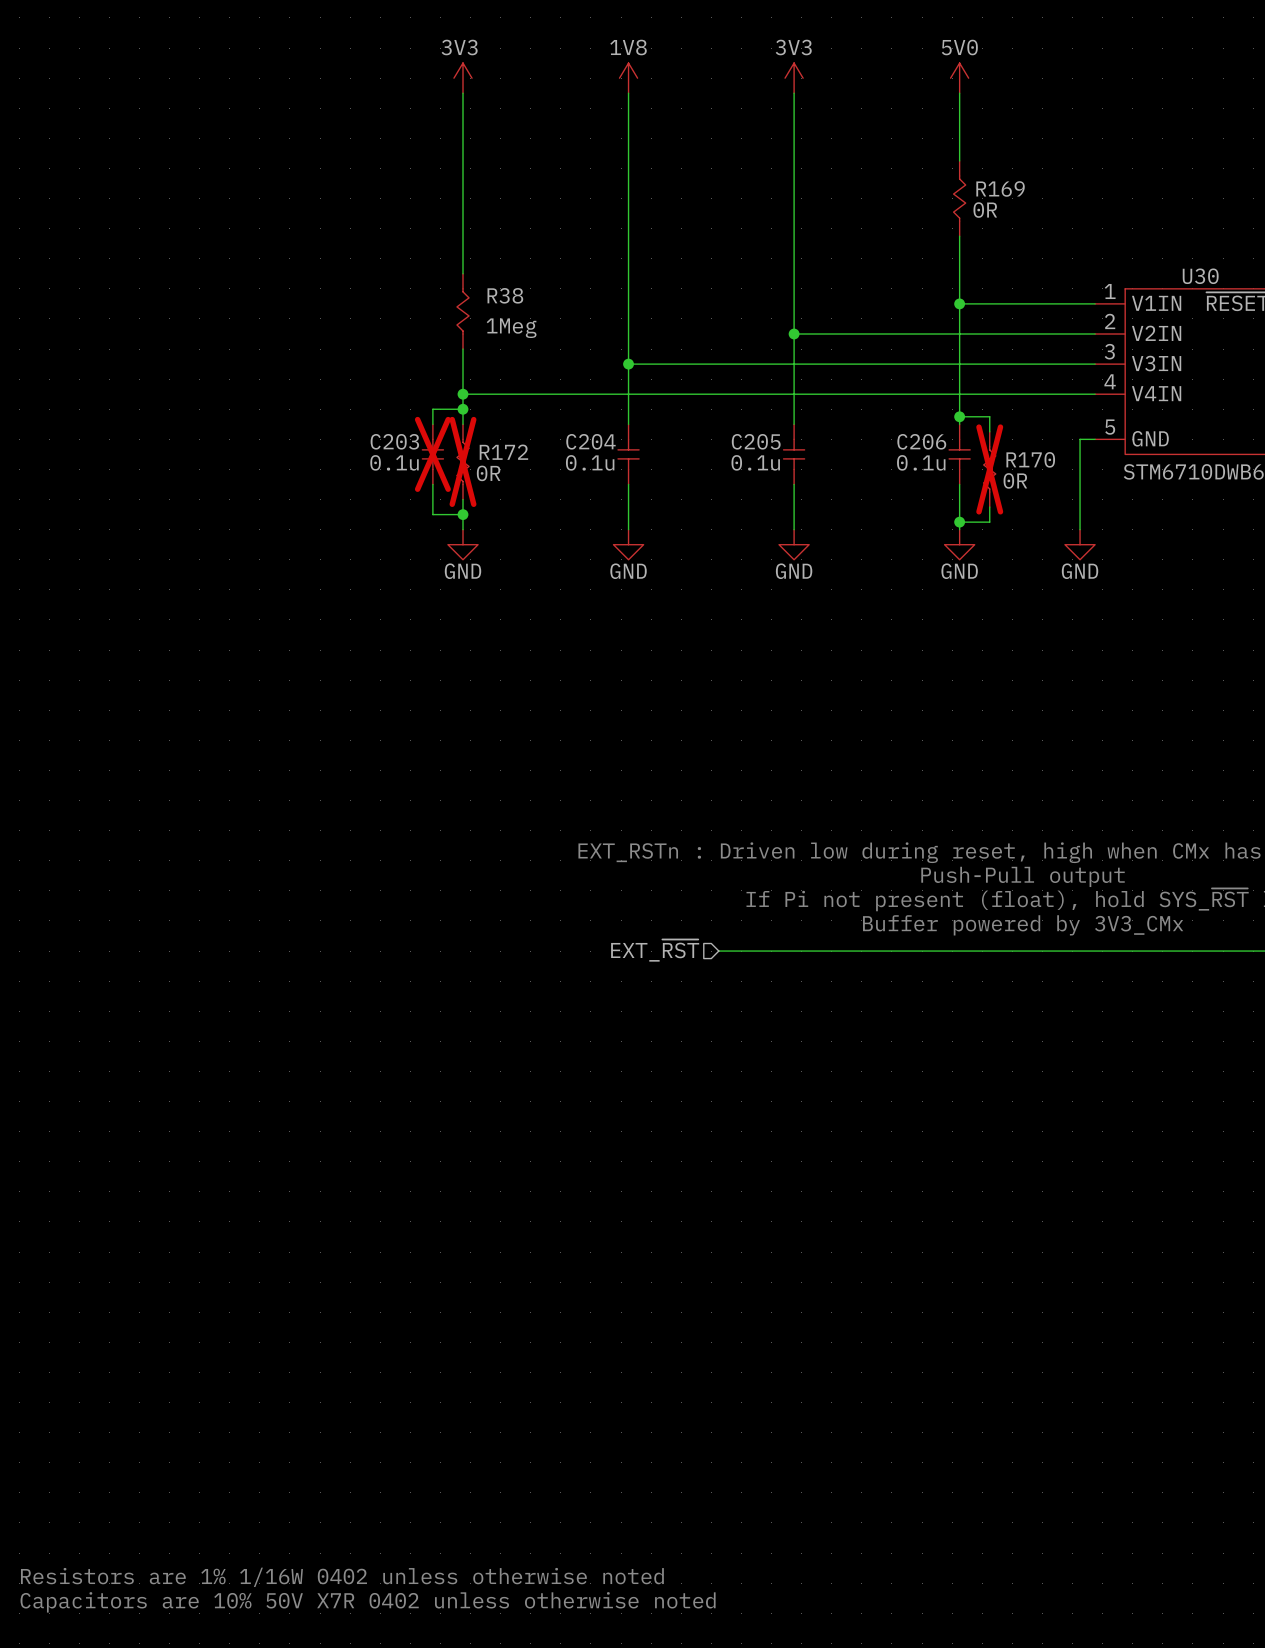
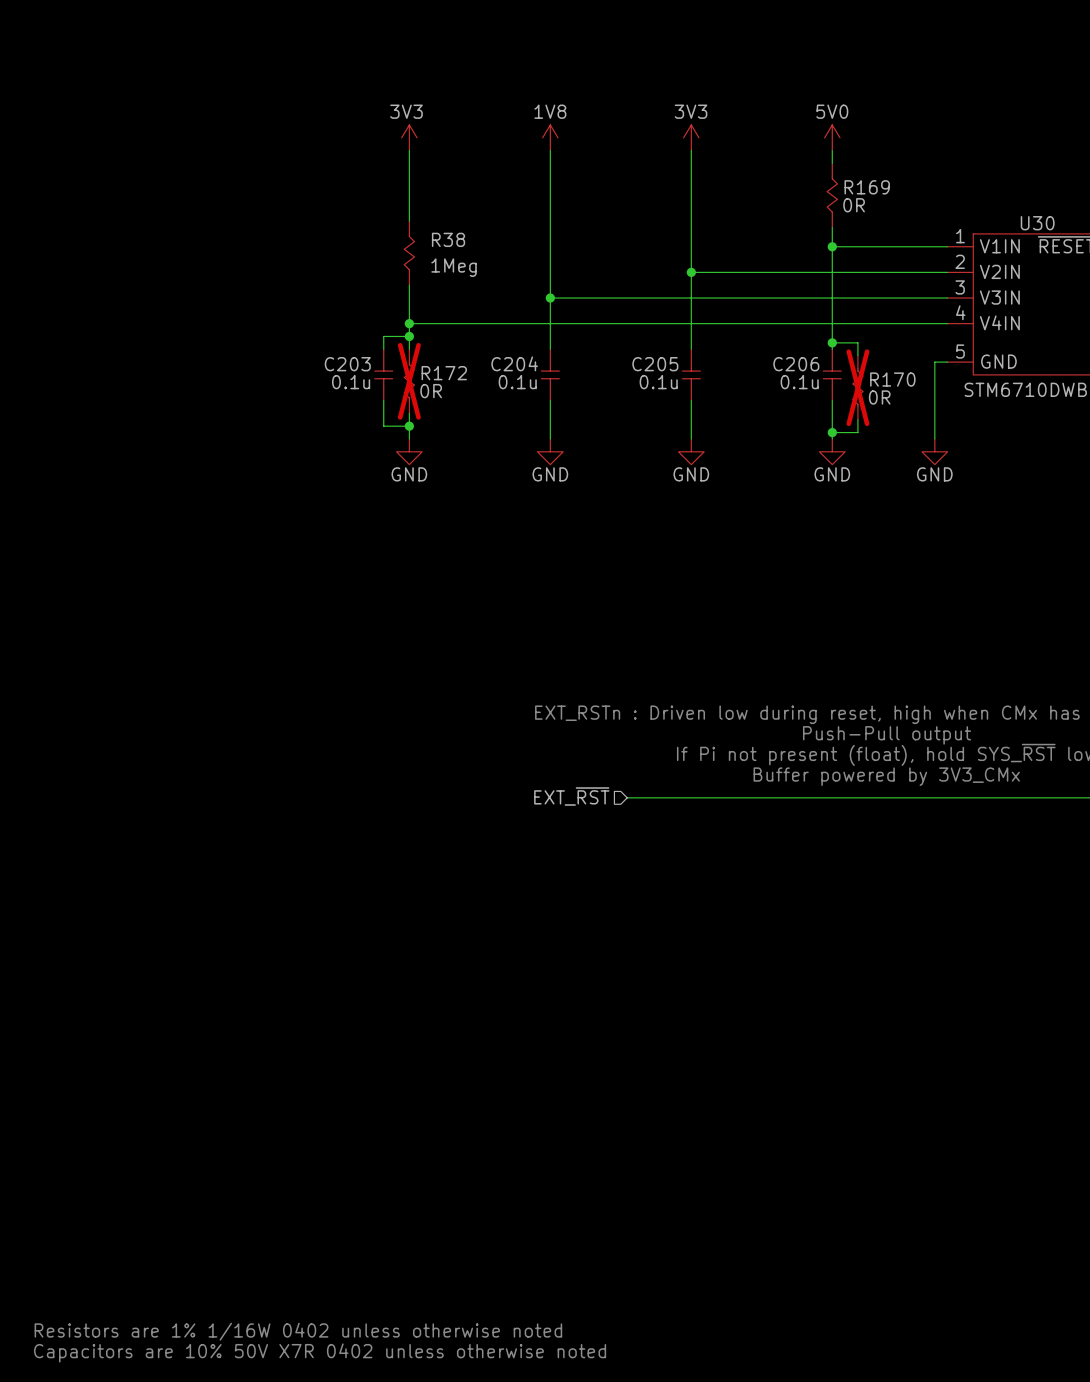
power symbol position: 3V3 (463, 78) -> 3V3 (409, 137)
power symbol position: 1V8 (628, 78) -> 1V8 (550, 137)
power symbol position: 3V3 (794, 78) -> 3V3 (691, 137)
power symbol position: 5V0 (959, 78) -> 5V0 (832, 137)
wire: (463, 93) (463, 191) -> none
wire: (628, 93) (628, 191) -> none
wire: (794, 93) (794, 191) -> none
wire: (959, 93) (959, 160) -> none
wire: none -> (832, 150) (832, 163)
R169 position: (959, 198) -> (832, 195)
C203 do-not-place cross: (432, 454) -> none

